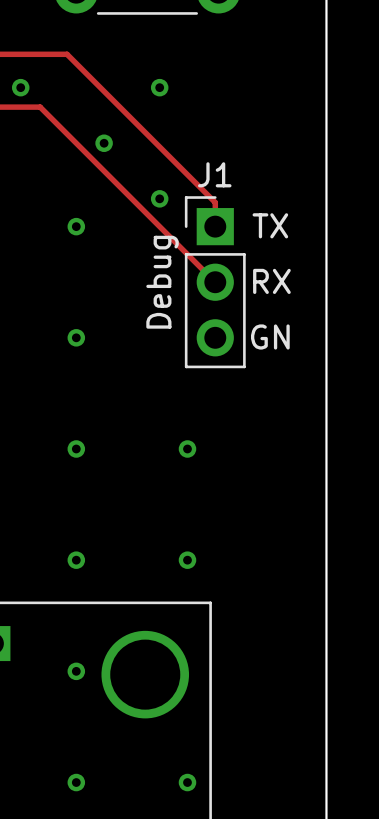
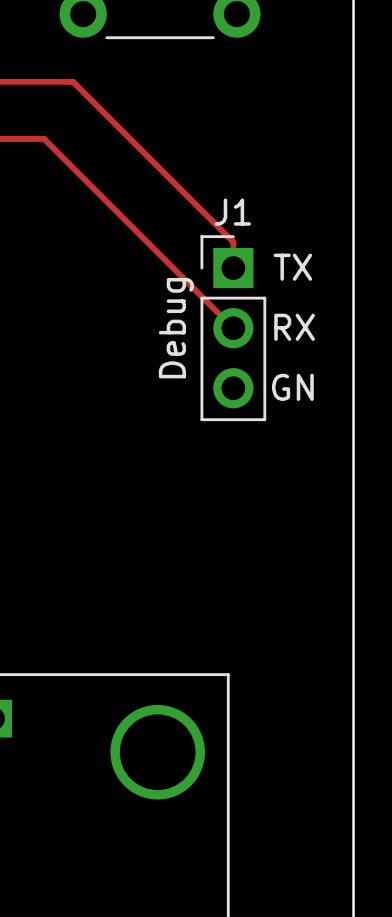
via: (20, 87) -> none
via: (159, 87) -> none
via: (104, 143) -> none
via: (159, 198) -> none
via: (76, 226) -> none
via: (76, 337) -> none
via: (76, 448) -> none
via: (187, 448) -> none
via: (76, 560) -> none
via: (187, 560) -> none
via: (76, 671) -> none
via: (76, 782) -> none
via: (187, 782) -> none

